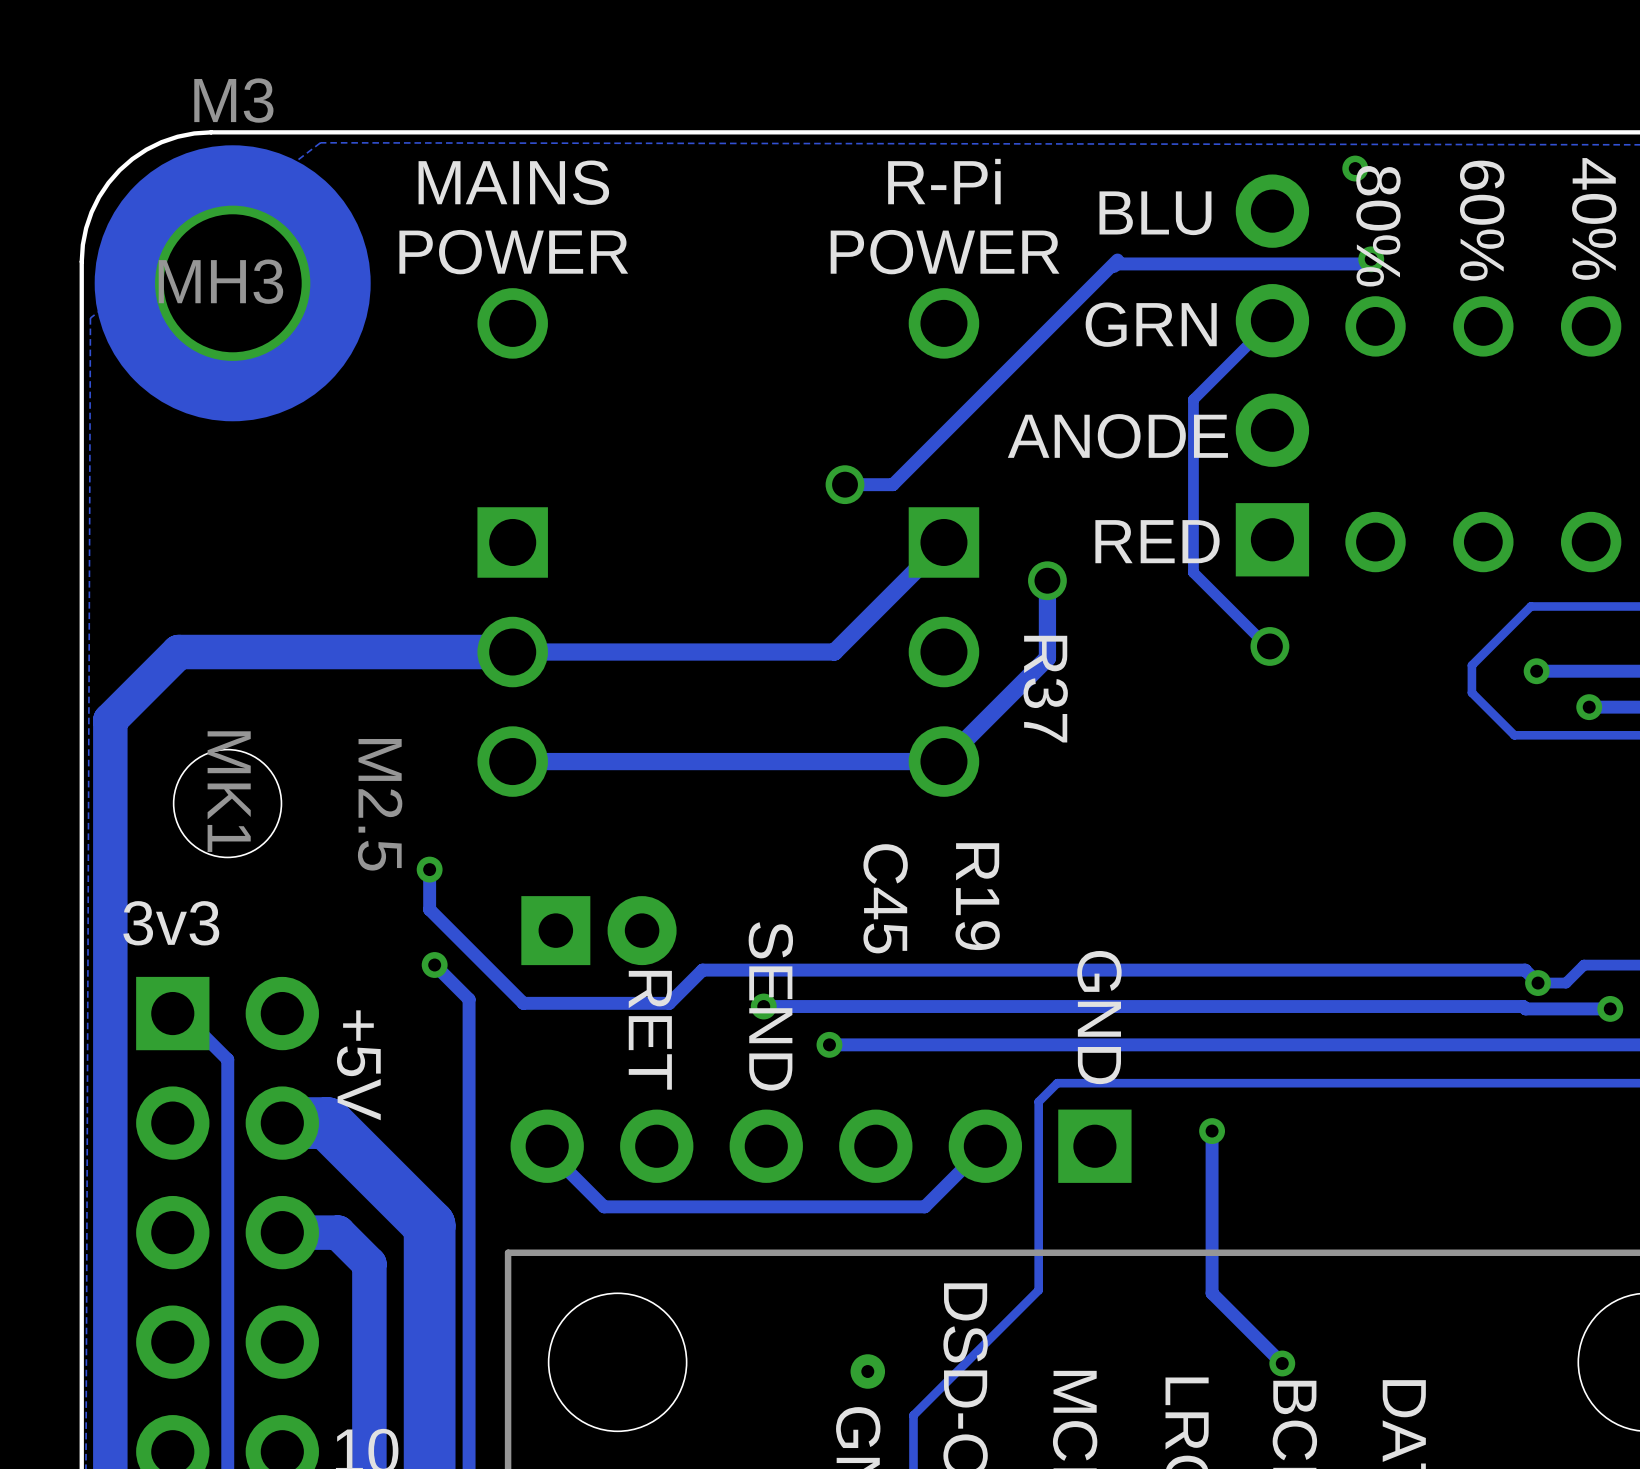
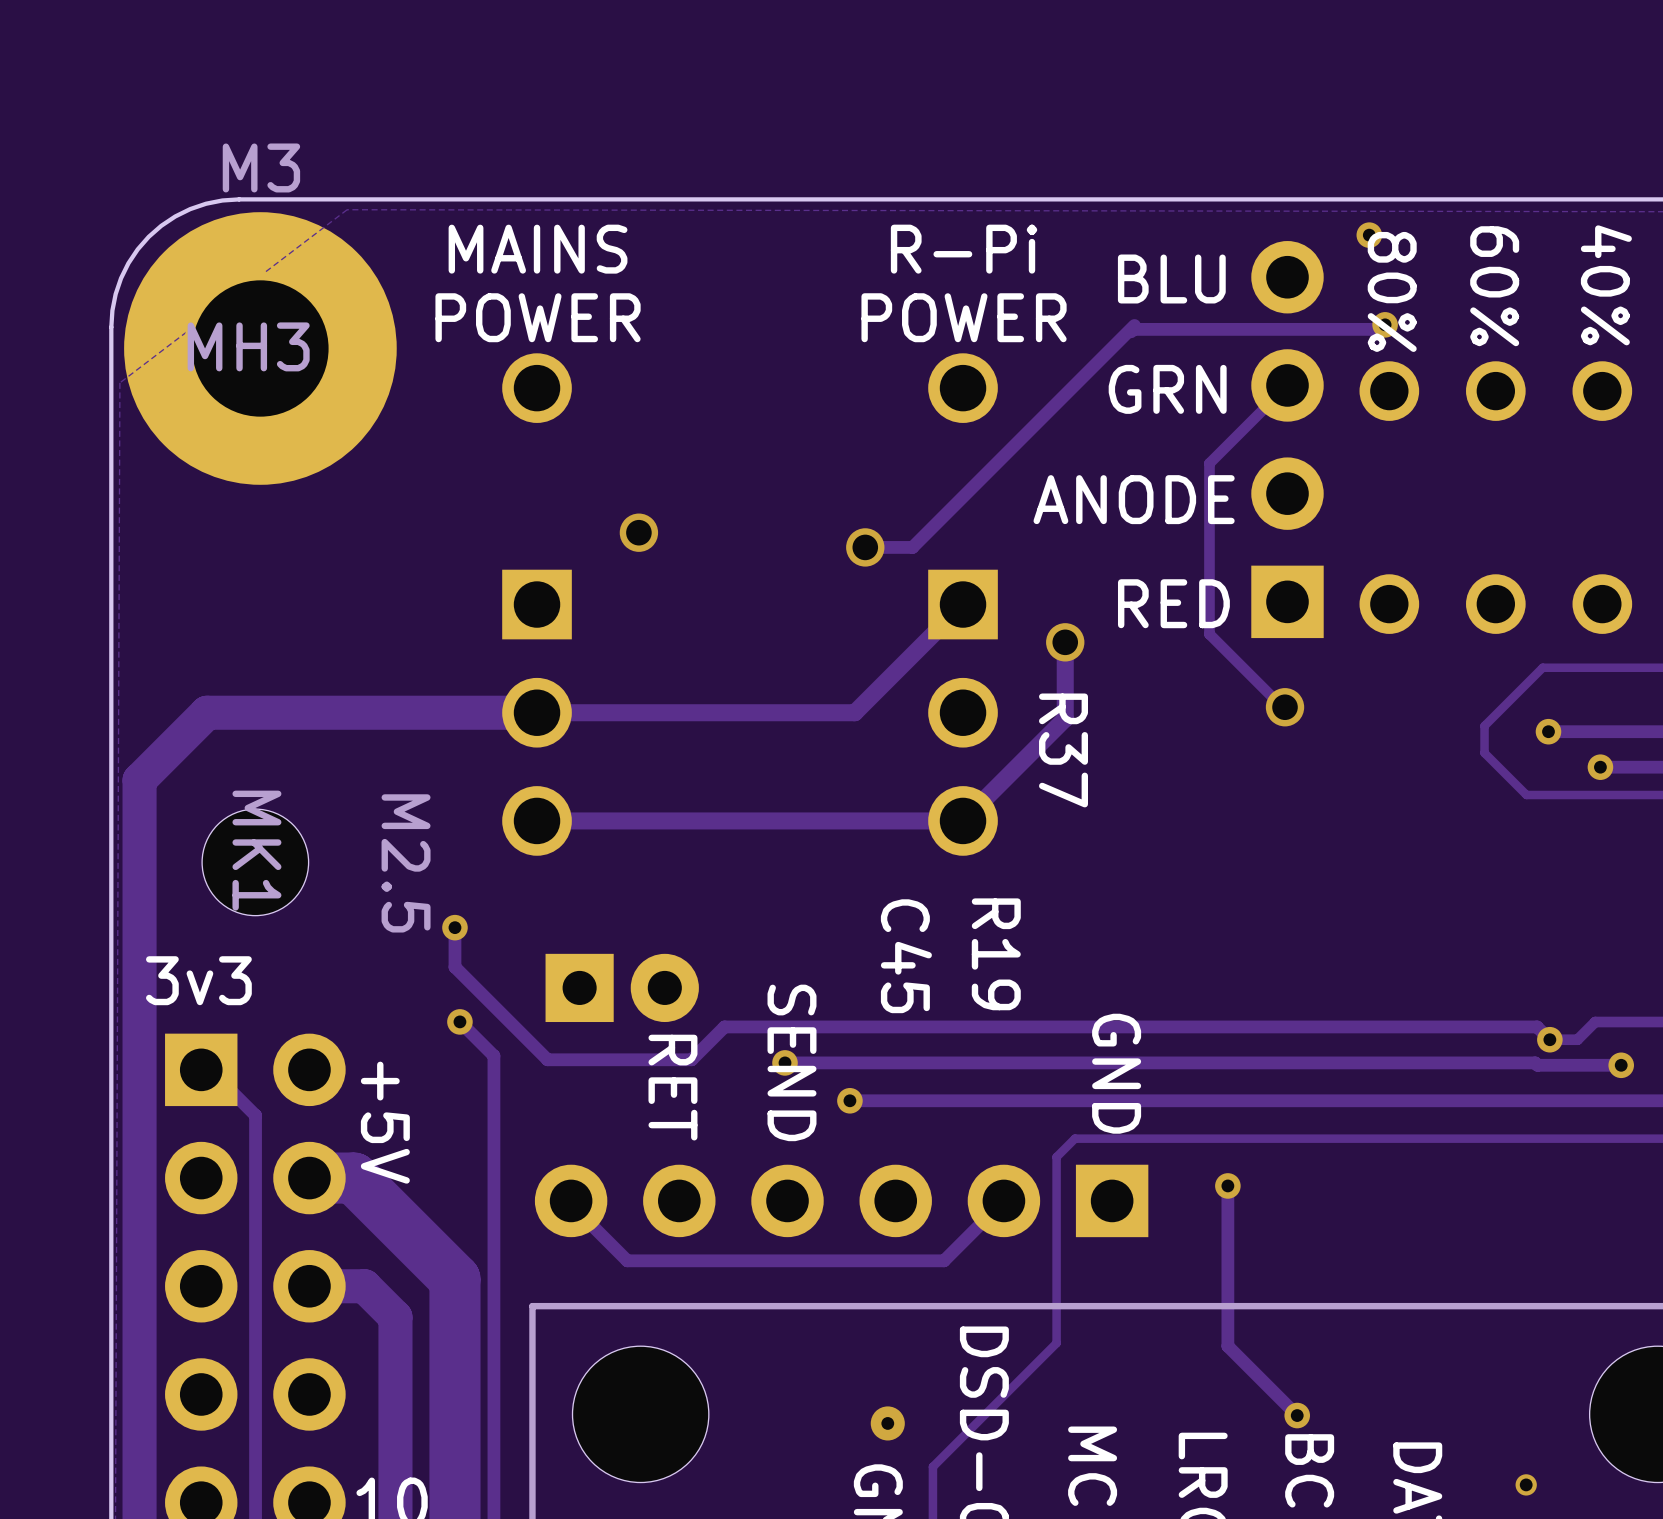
via: none -> (638, 532)
via: none -> (1526, 1484)

